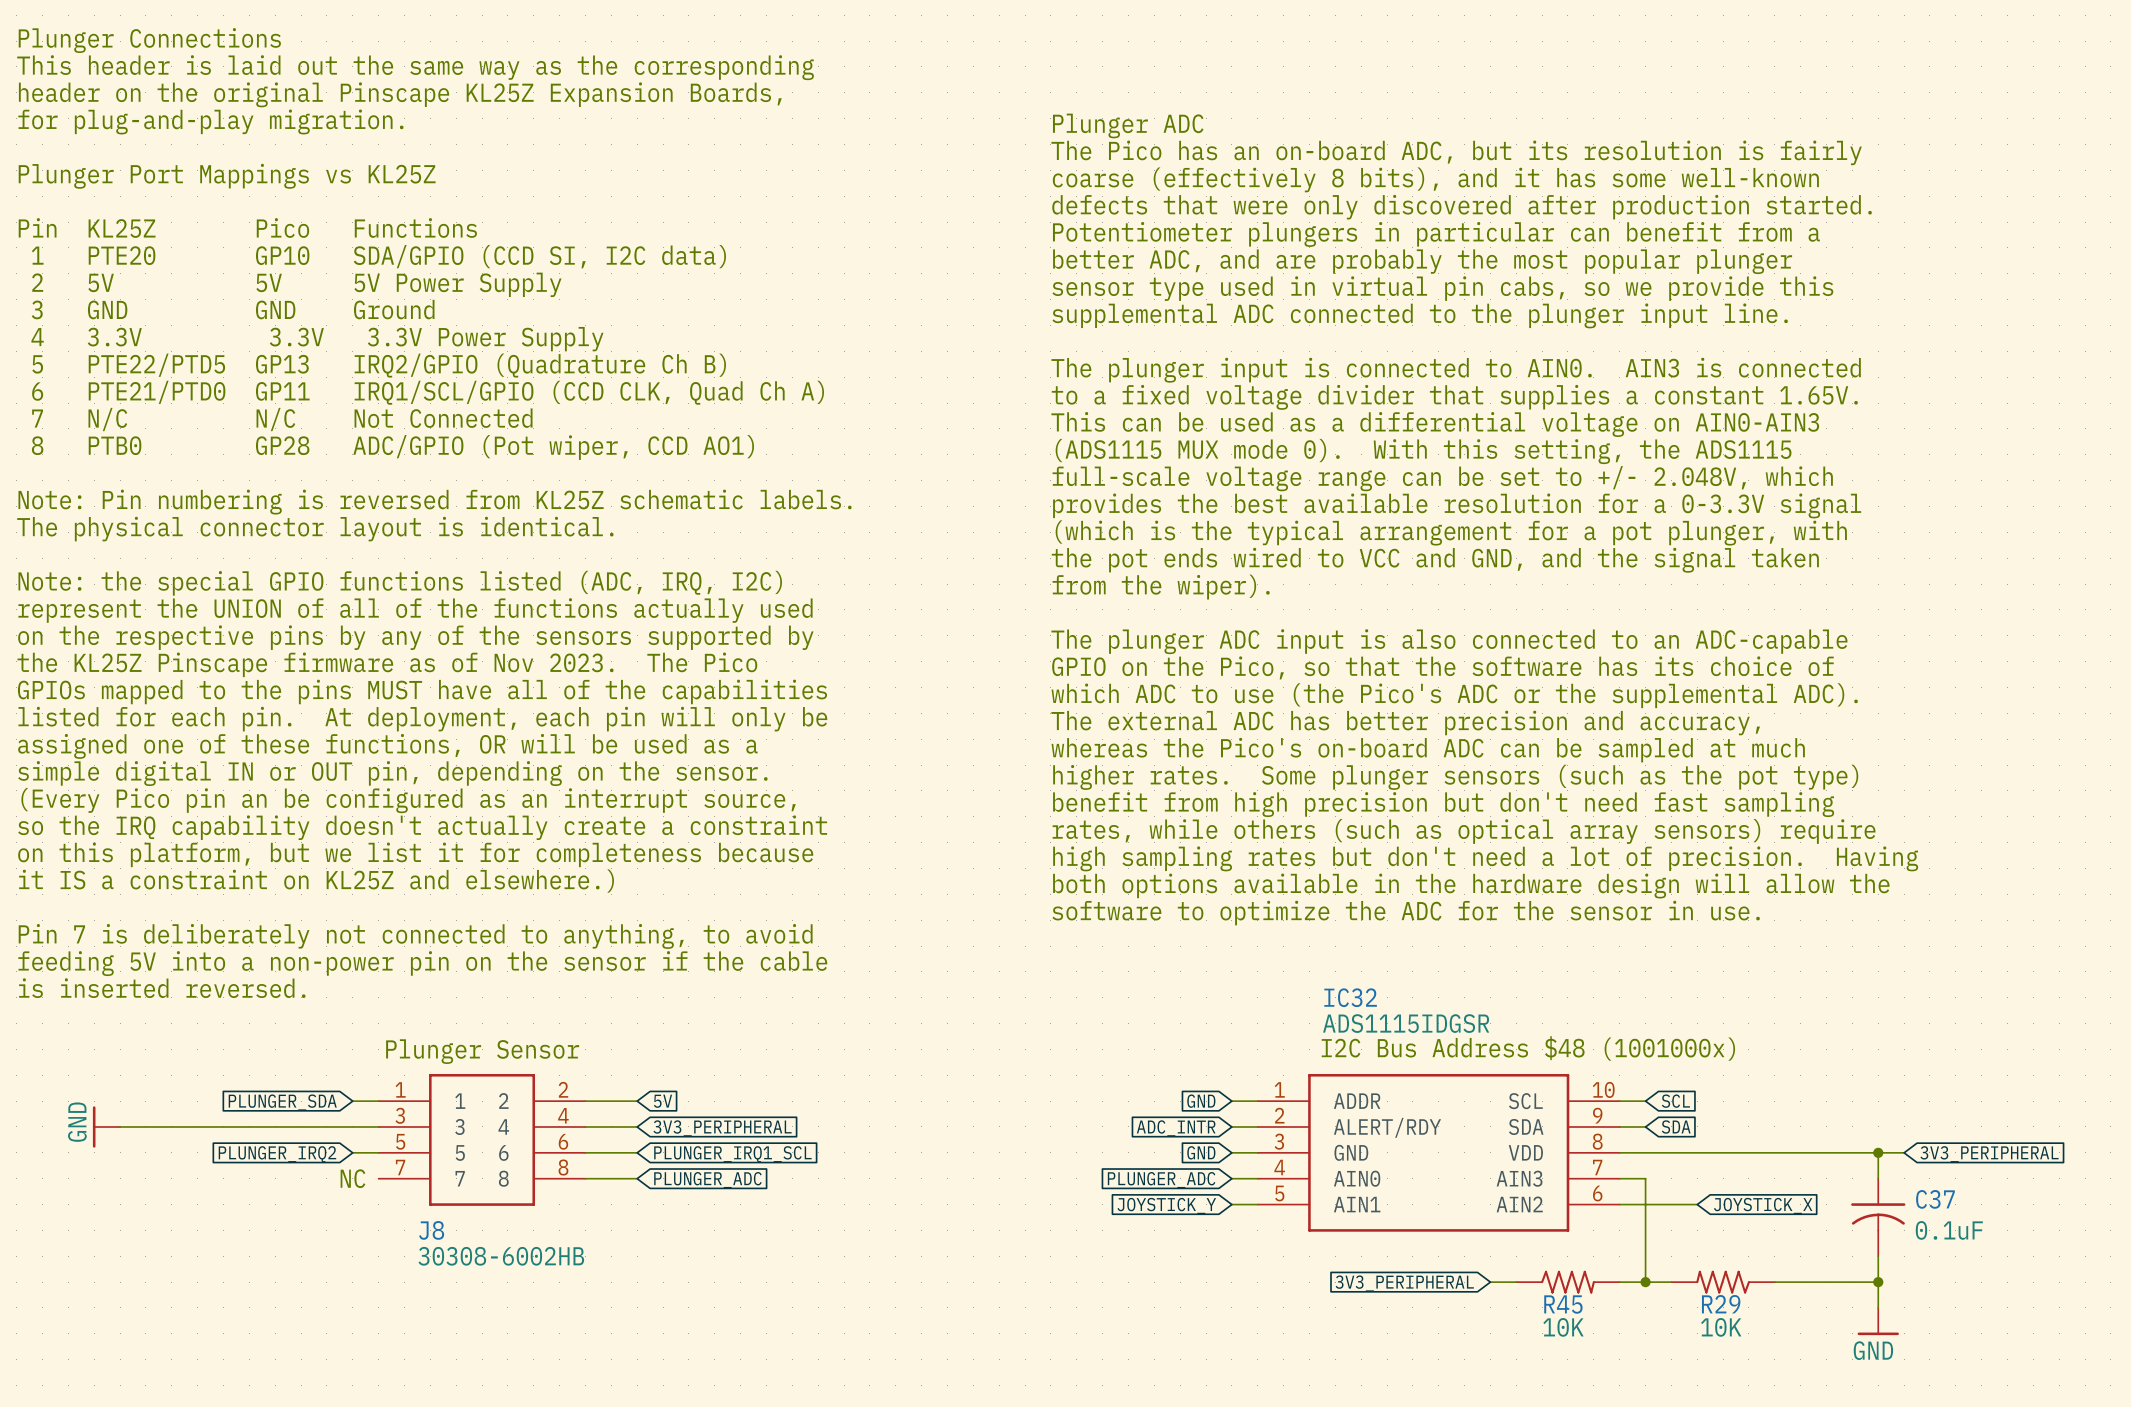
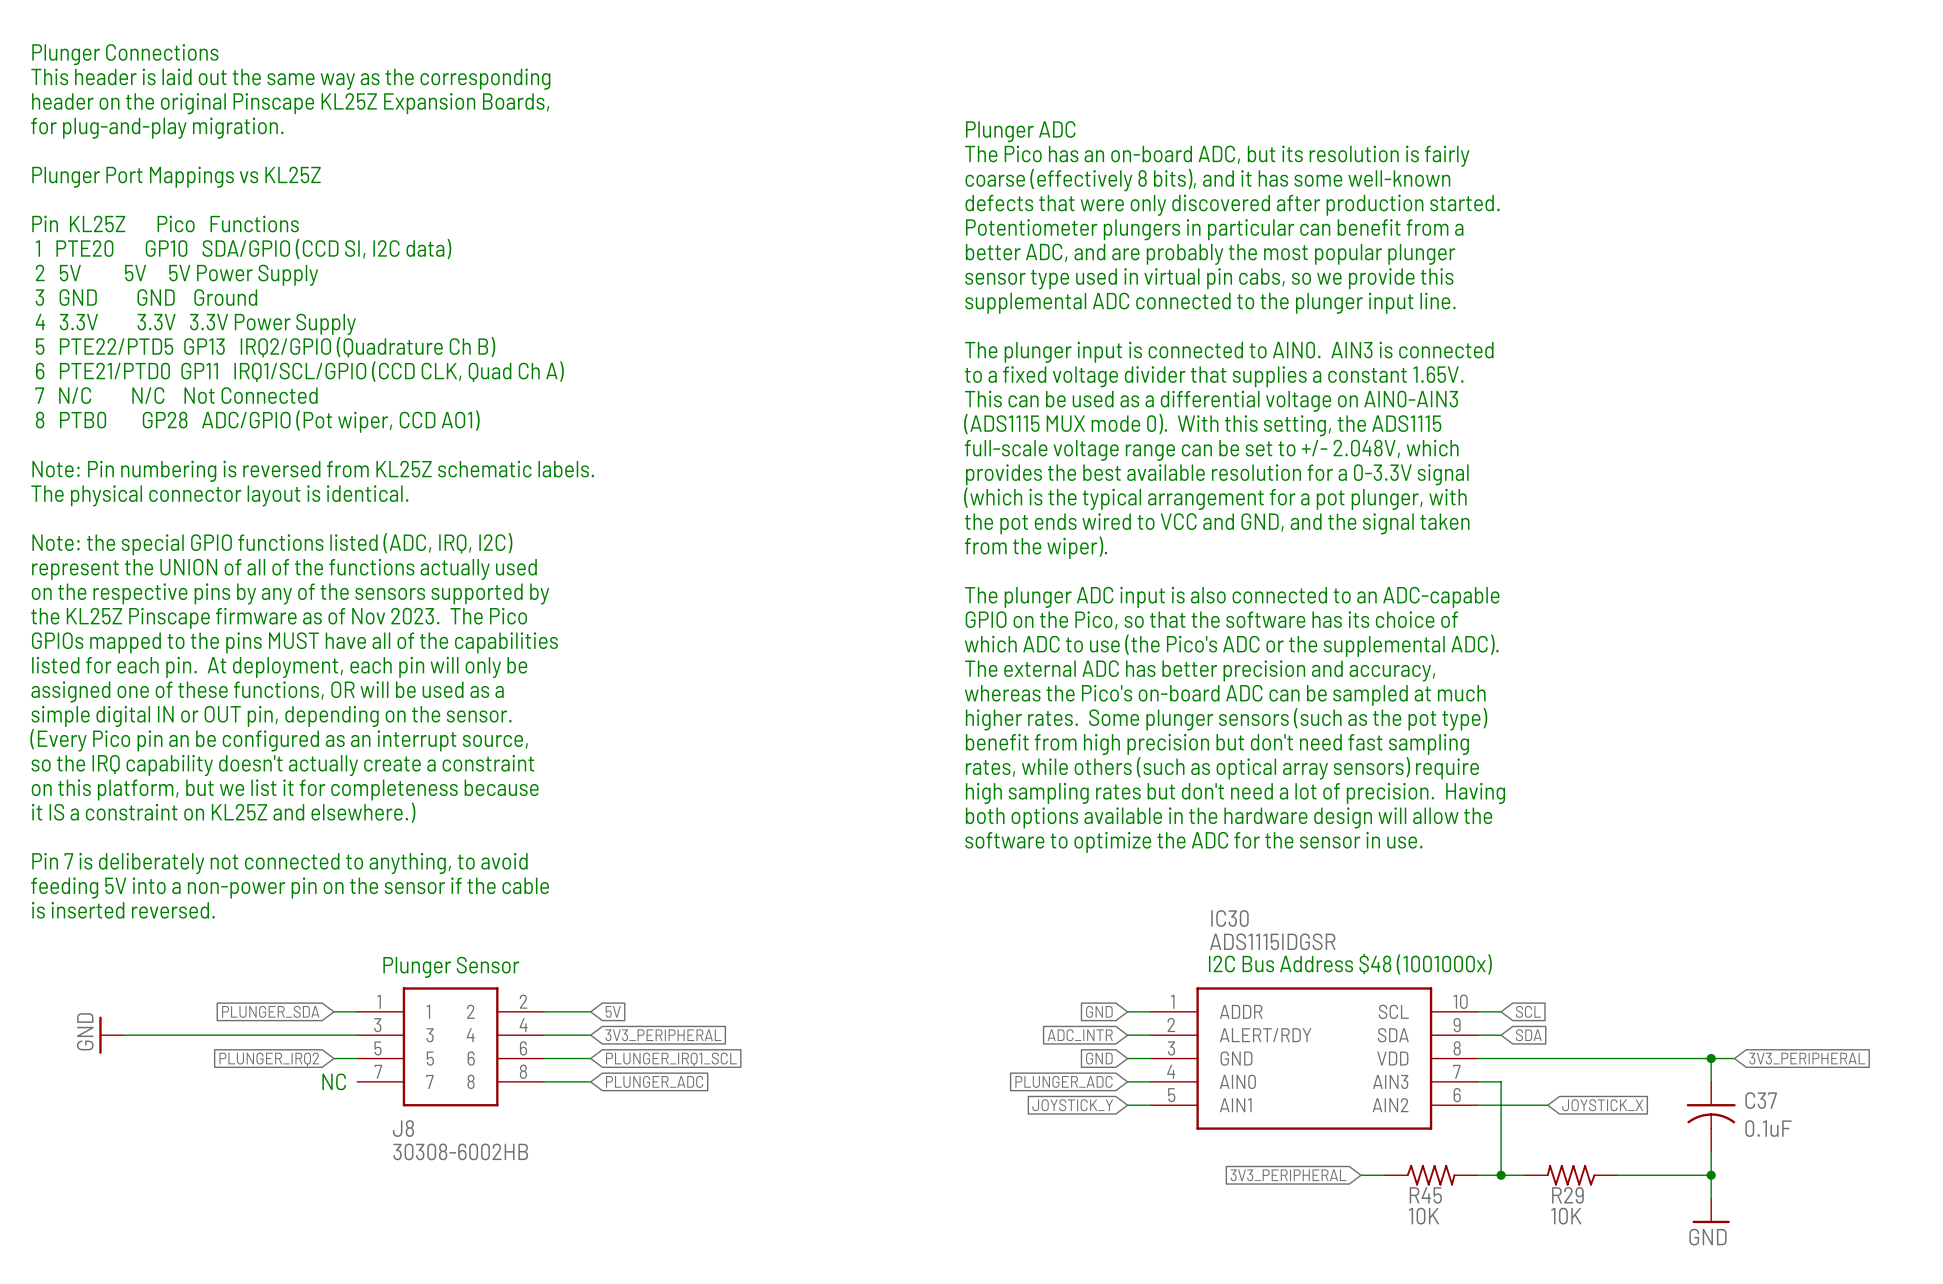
IC32 name: IC32 (1350, 997) -> IC30 (1229, 918)

